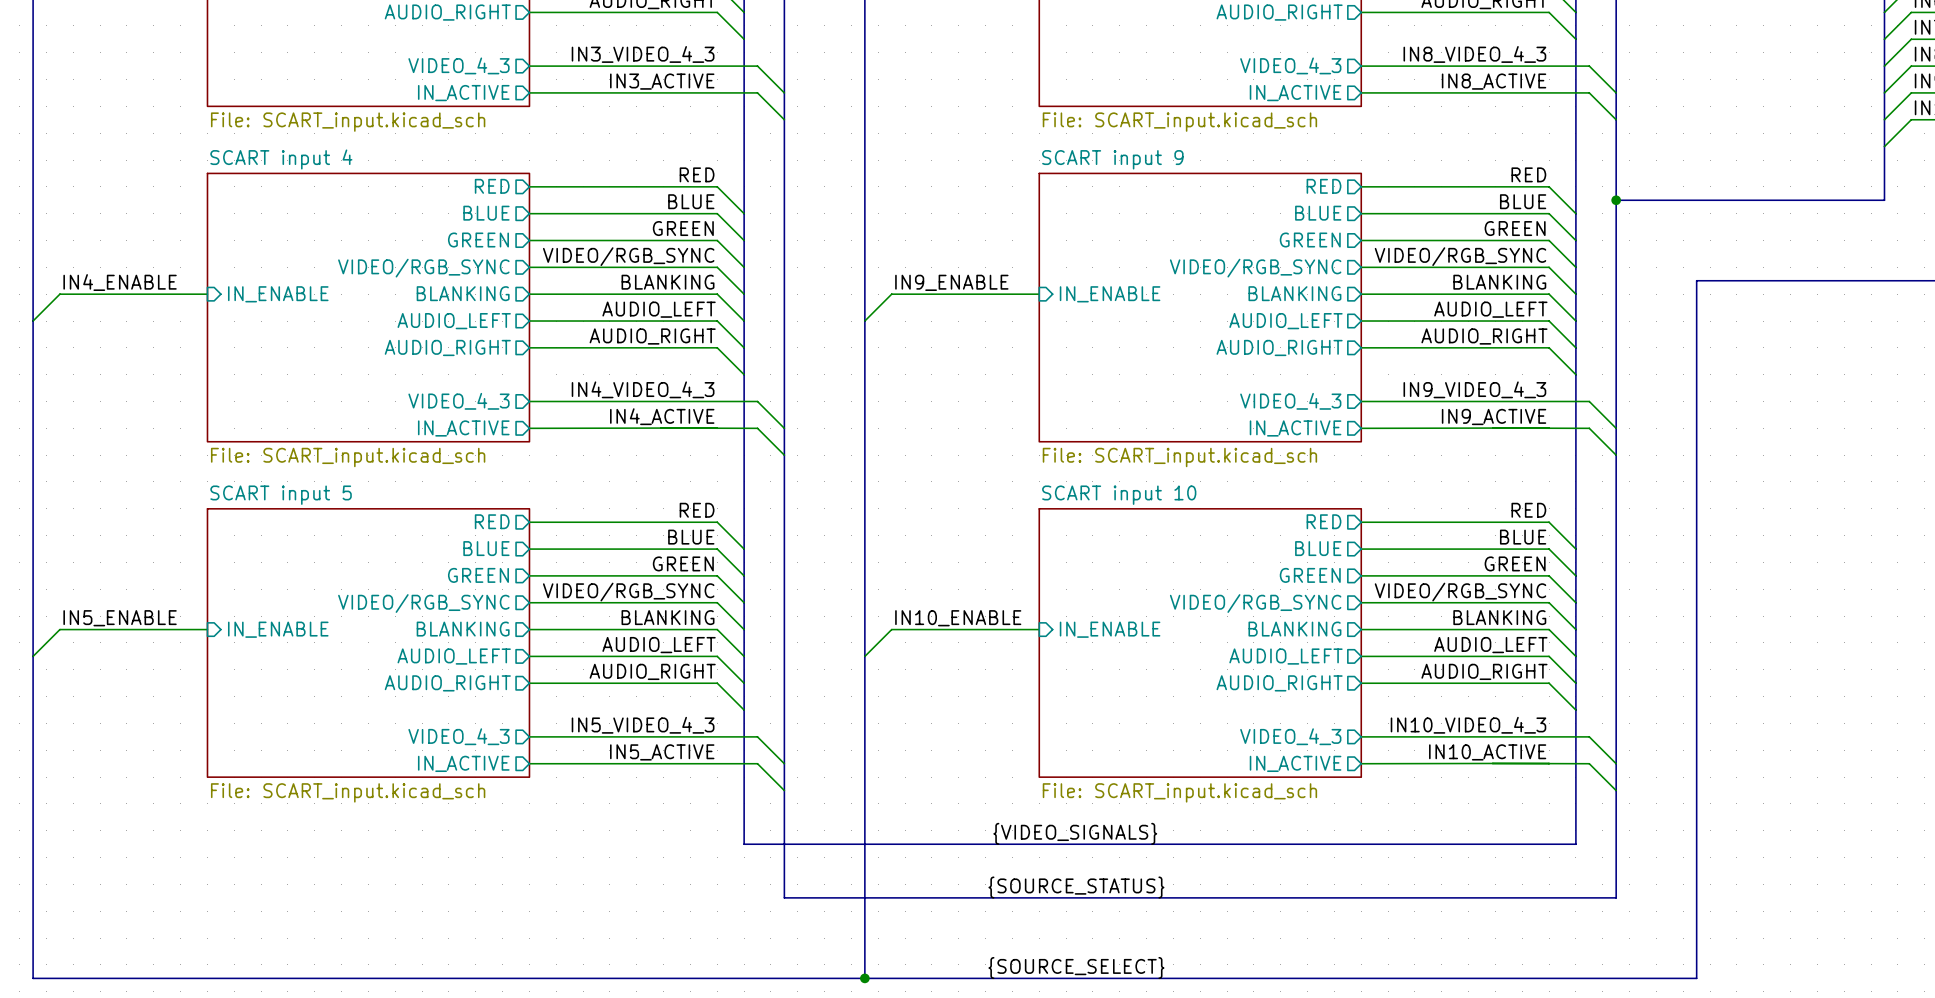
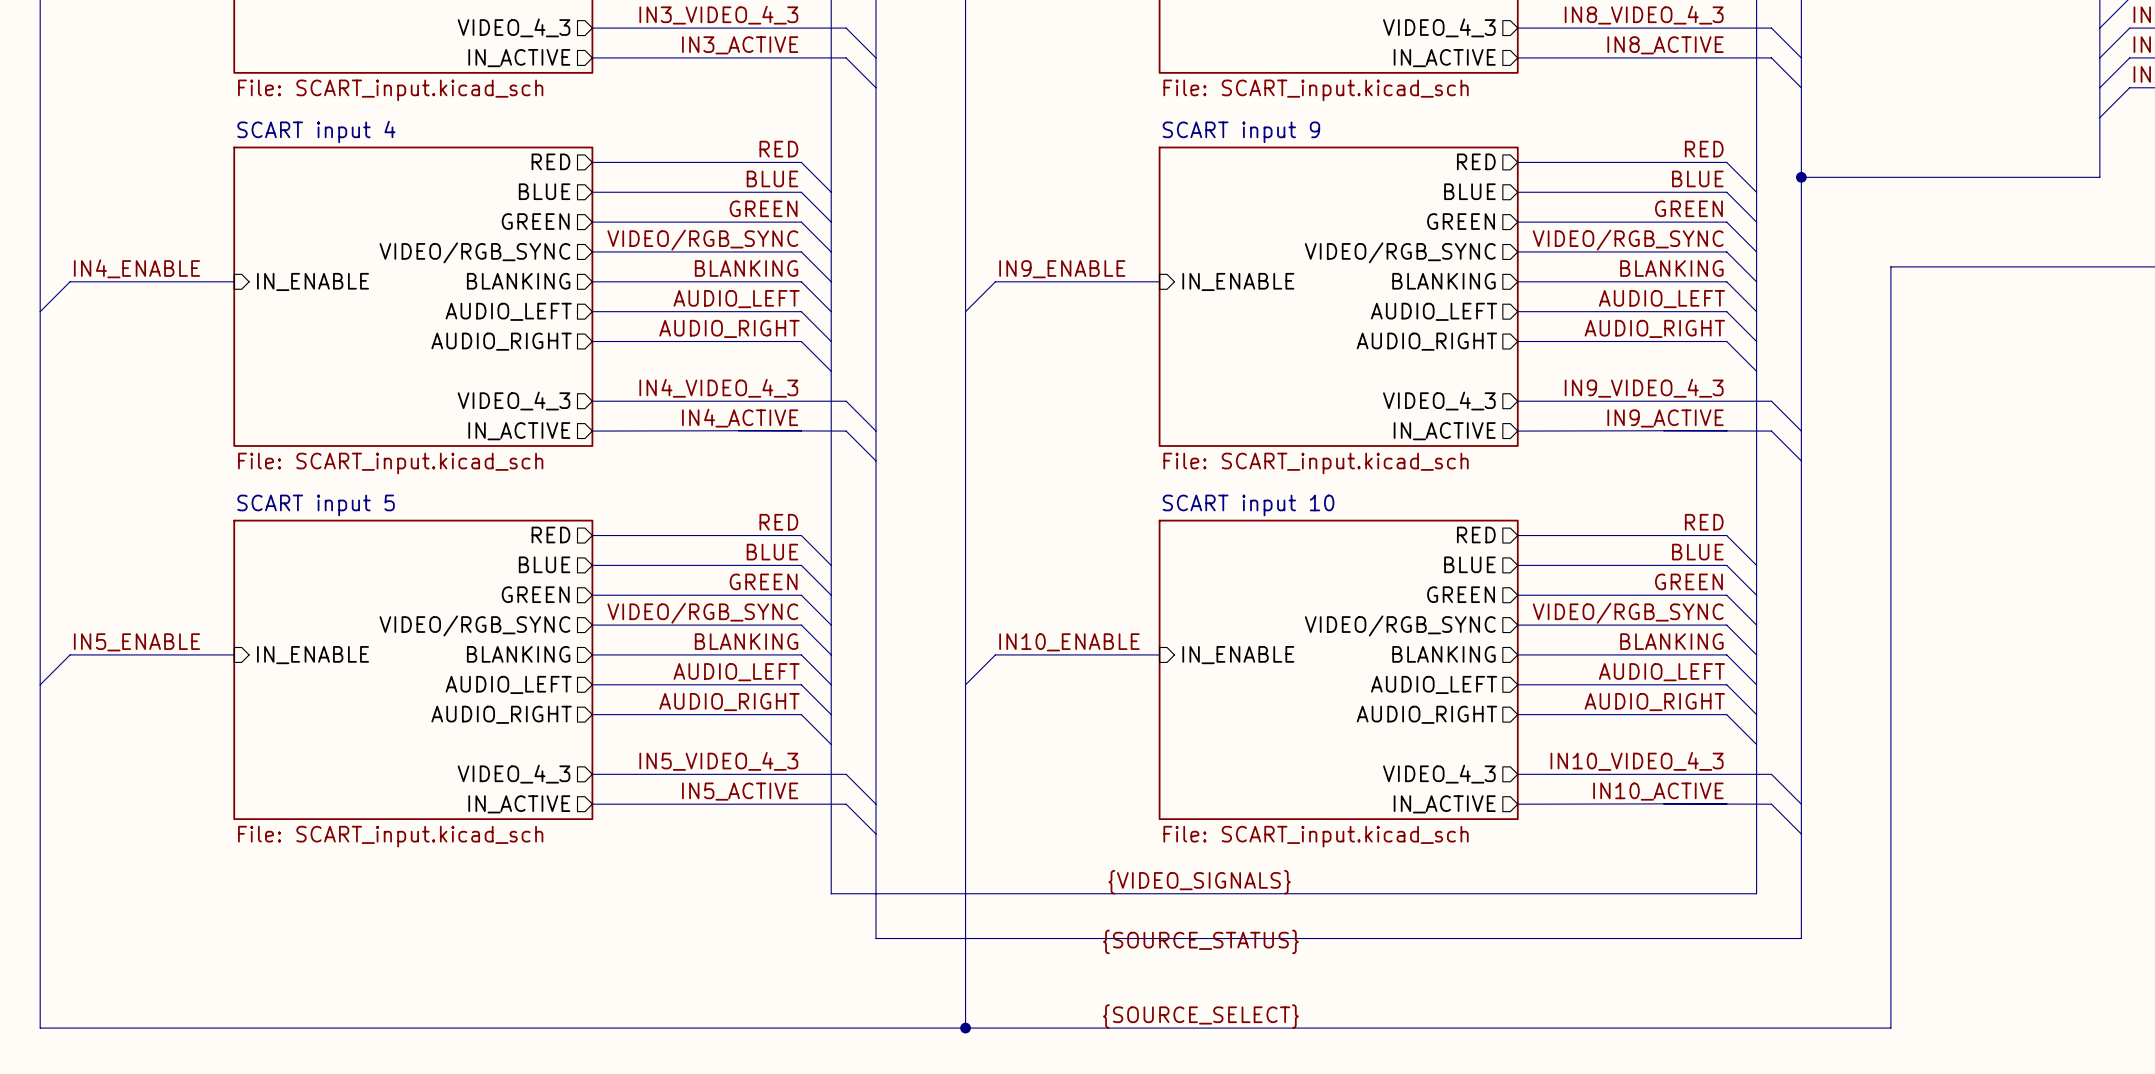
bus: (784, 884) (784, 897) (1616, 897) (1616, 884) -> (876, 938) (1801, 938)
bus: (33, 964) (33, 978) (1696, 978) (1696, 964) -> (40, 1028) (1890, 1028)
bus: (864, 964) (864, 978) -> none
label position: {SOURCE_SELECT} (1076, 968) -> {SOURCE_SELECT} (1200, 1016)
junction position: (864, 978) -> (965, 1028)

